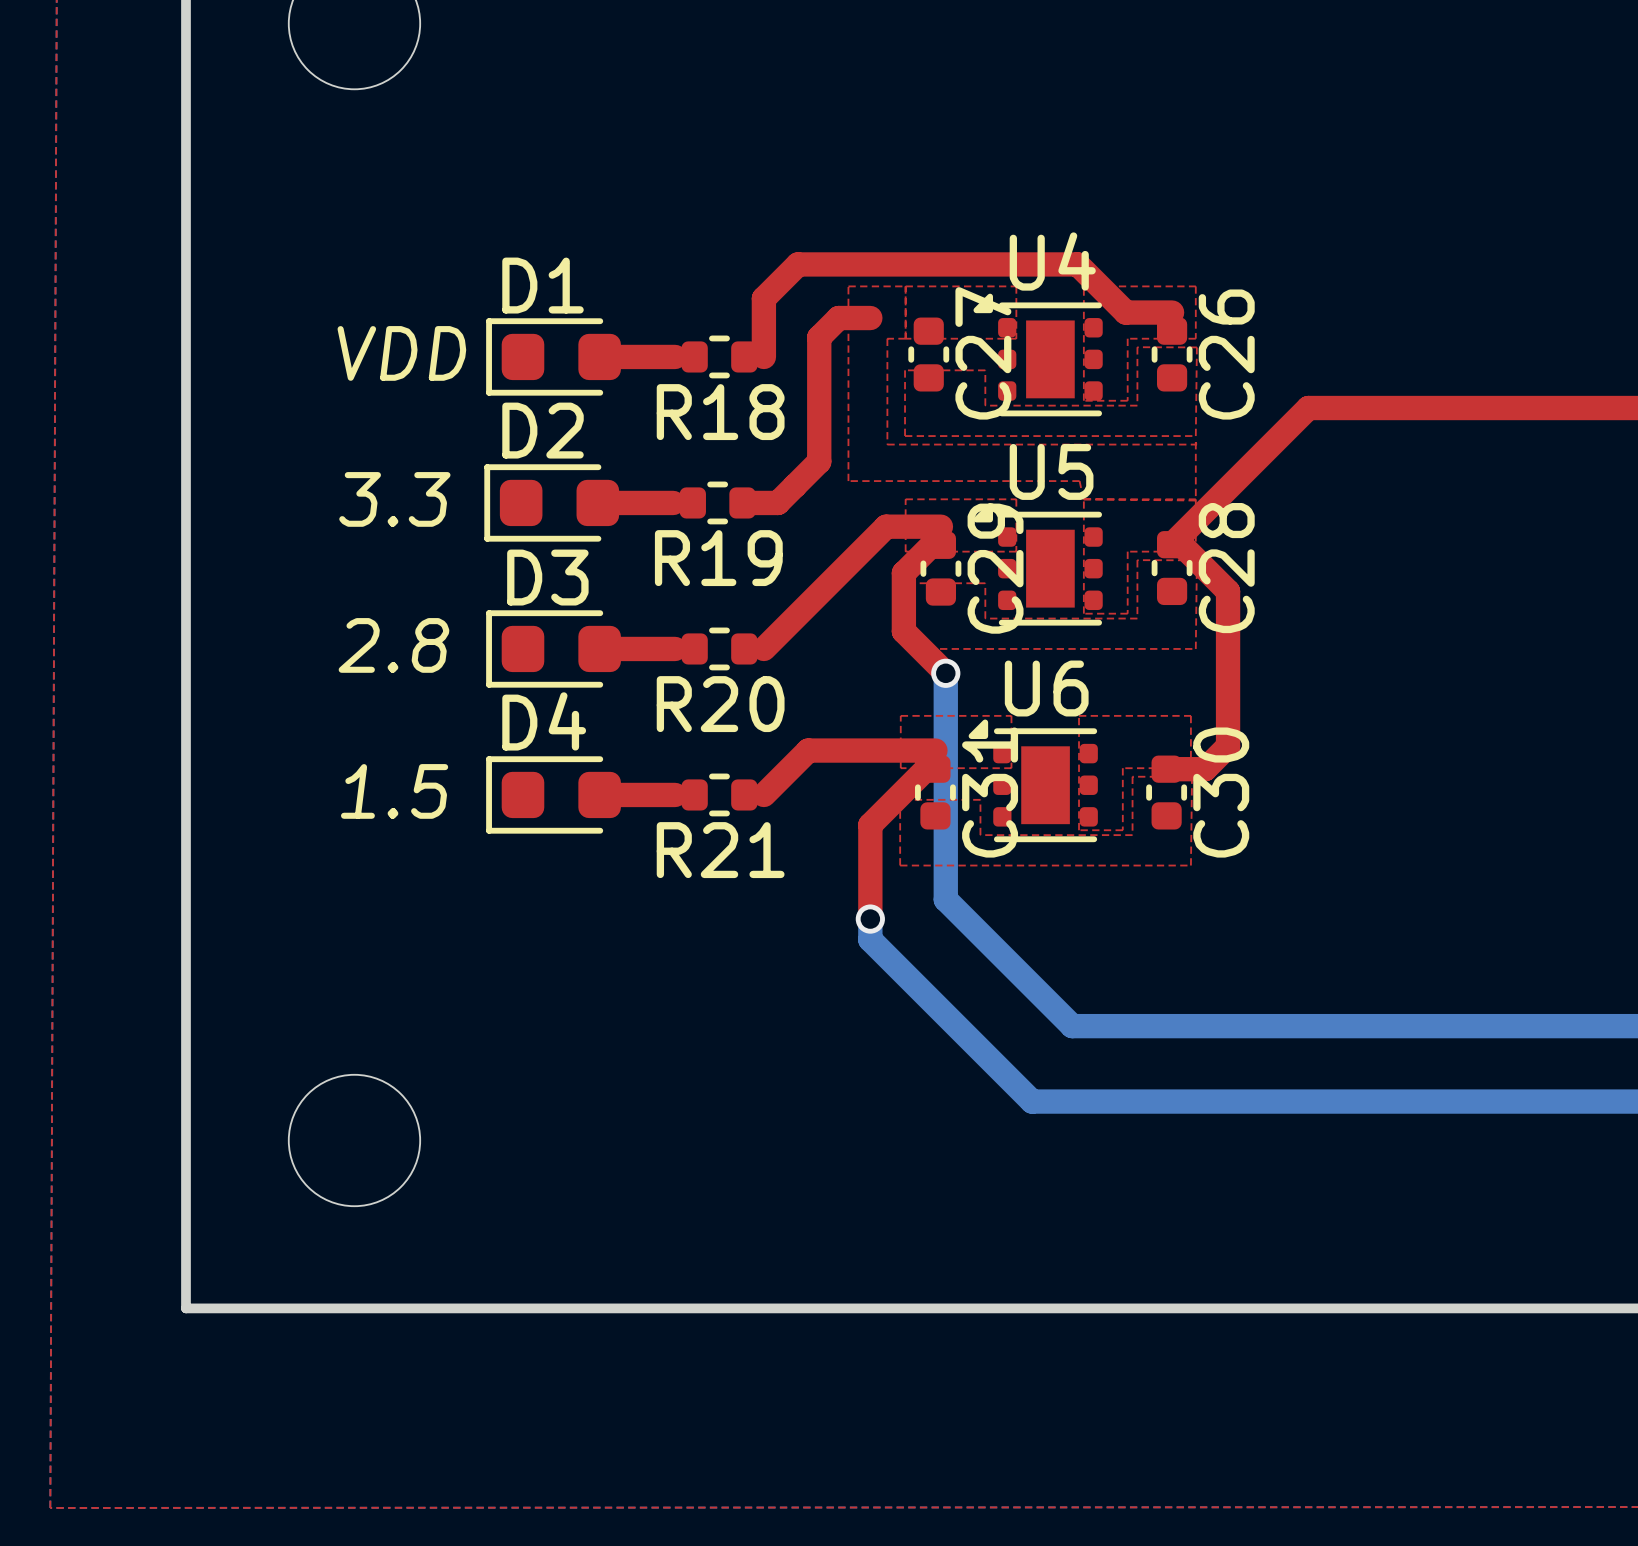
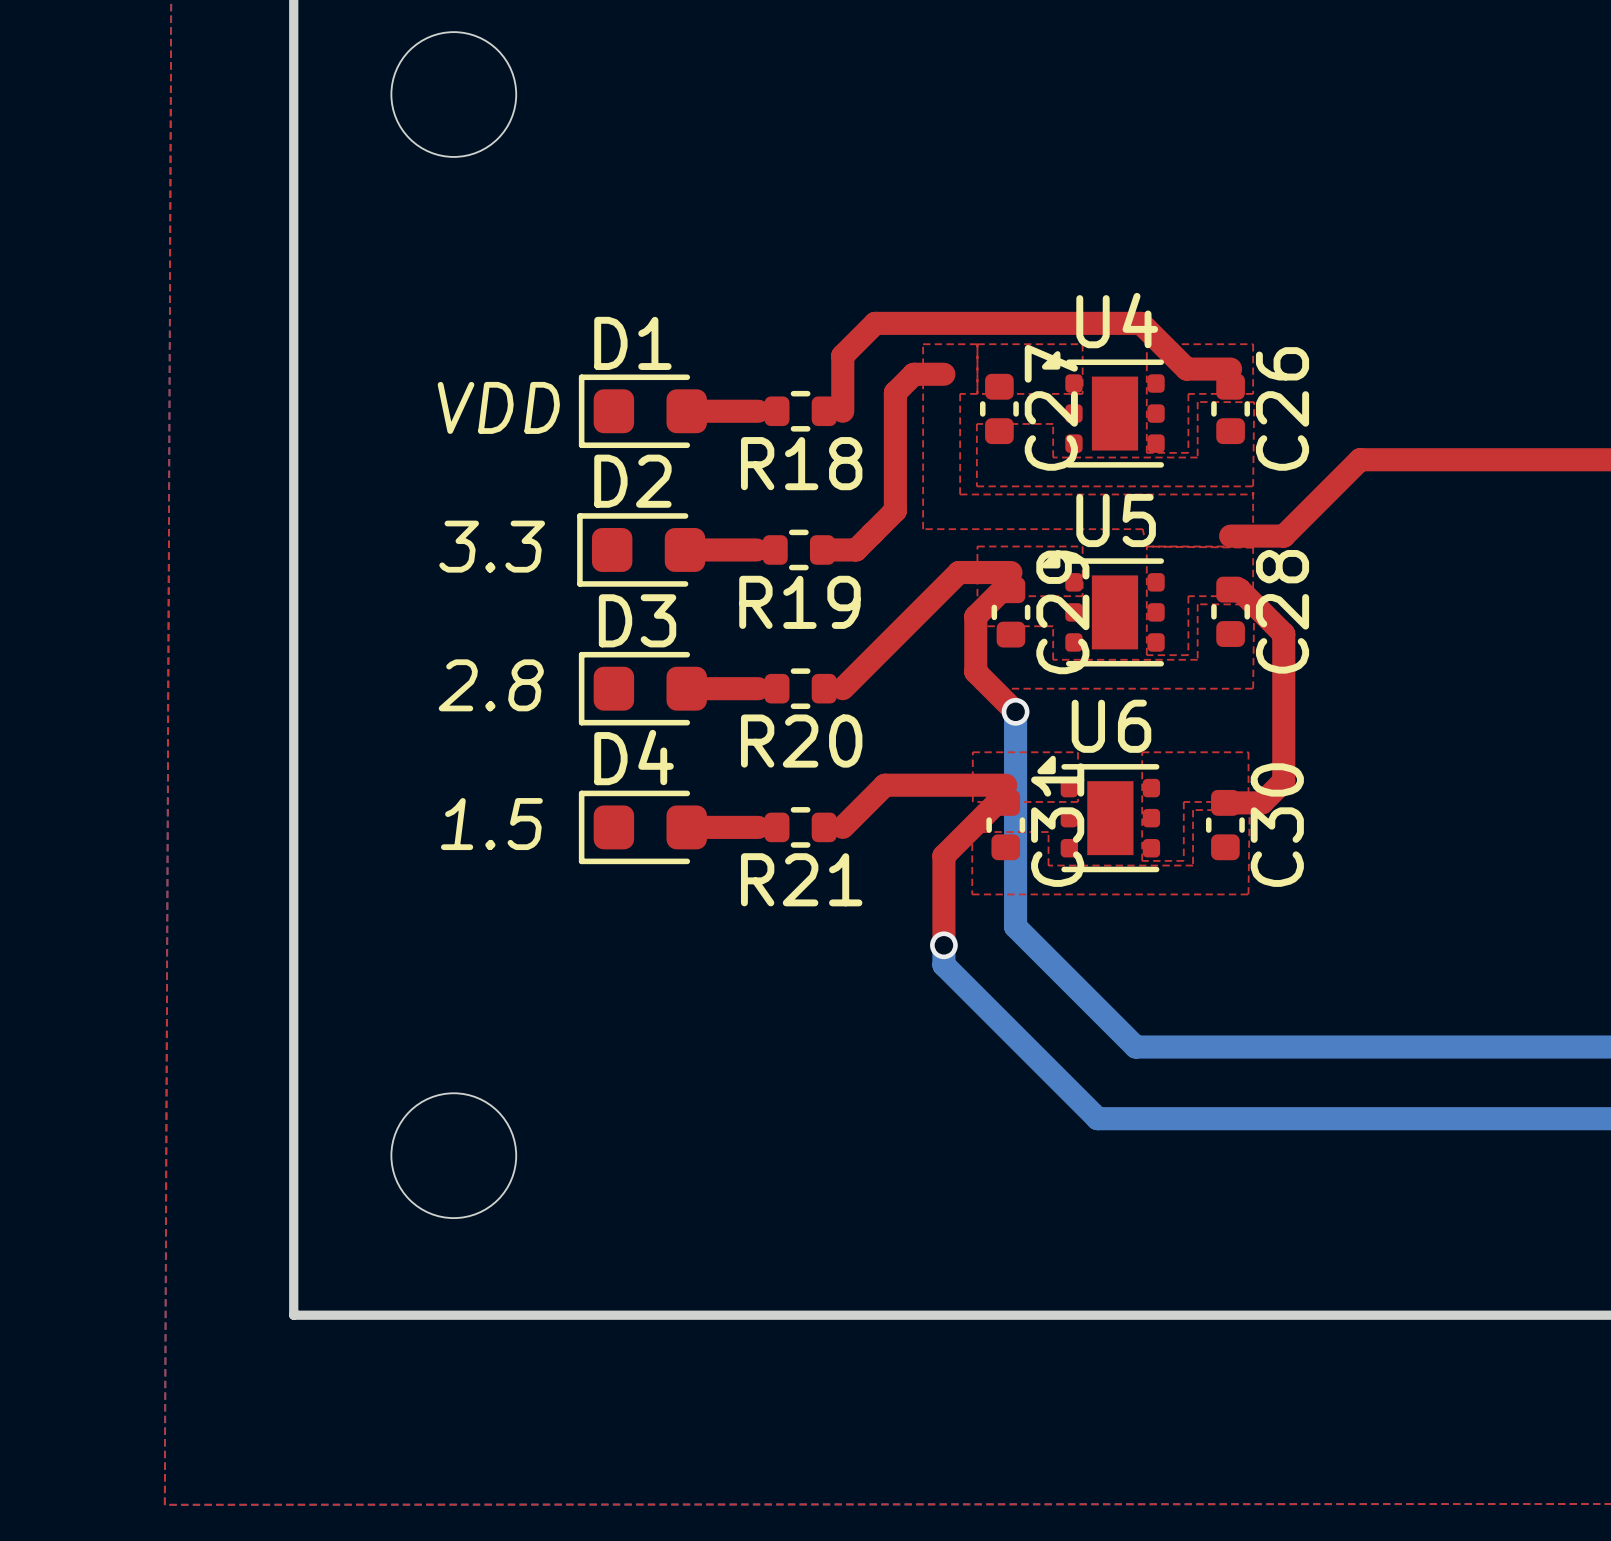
top track: (1228, 488) (1172, 544) -> (1283, 536) (1230, 536)

